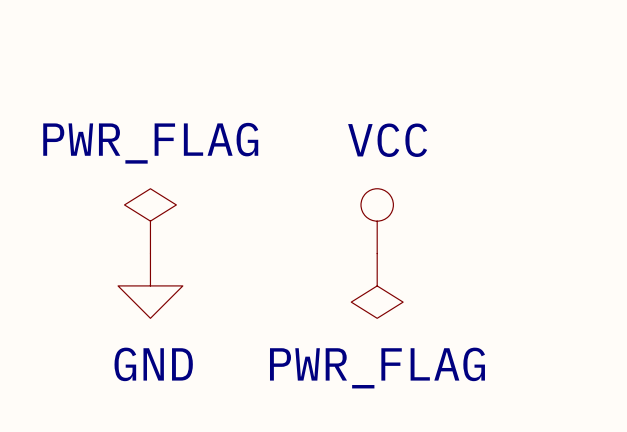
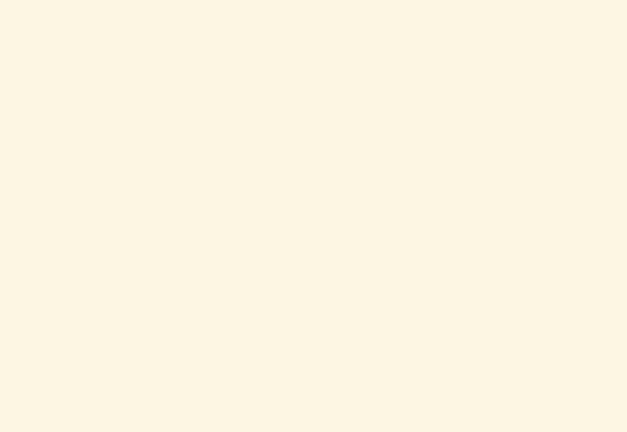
power symbol: PWR_FLAG (150, 221) -> none
power symbol: VCC (377, 221) -> none
power symbol: GND (150, 285) -> none
power symbol: PWR_FLAG (377, 285) -> none

